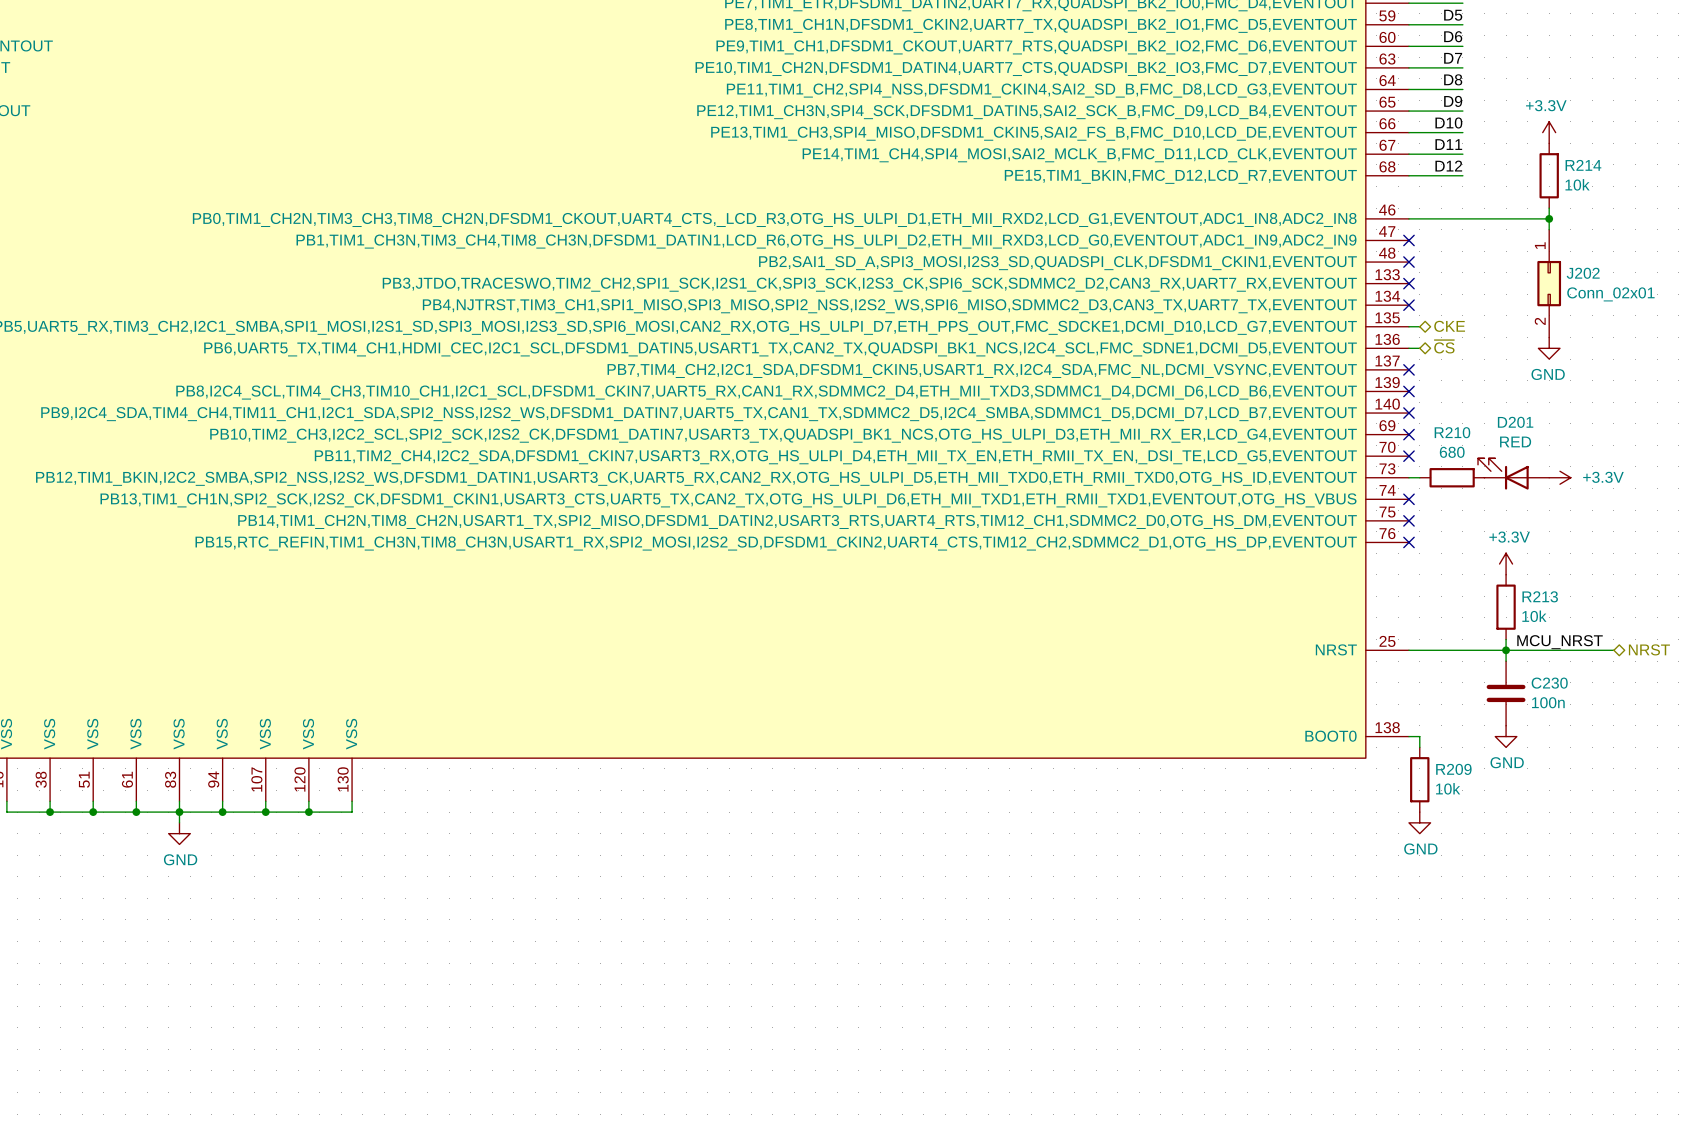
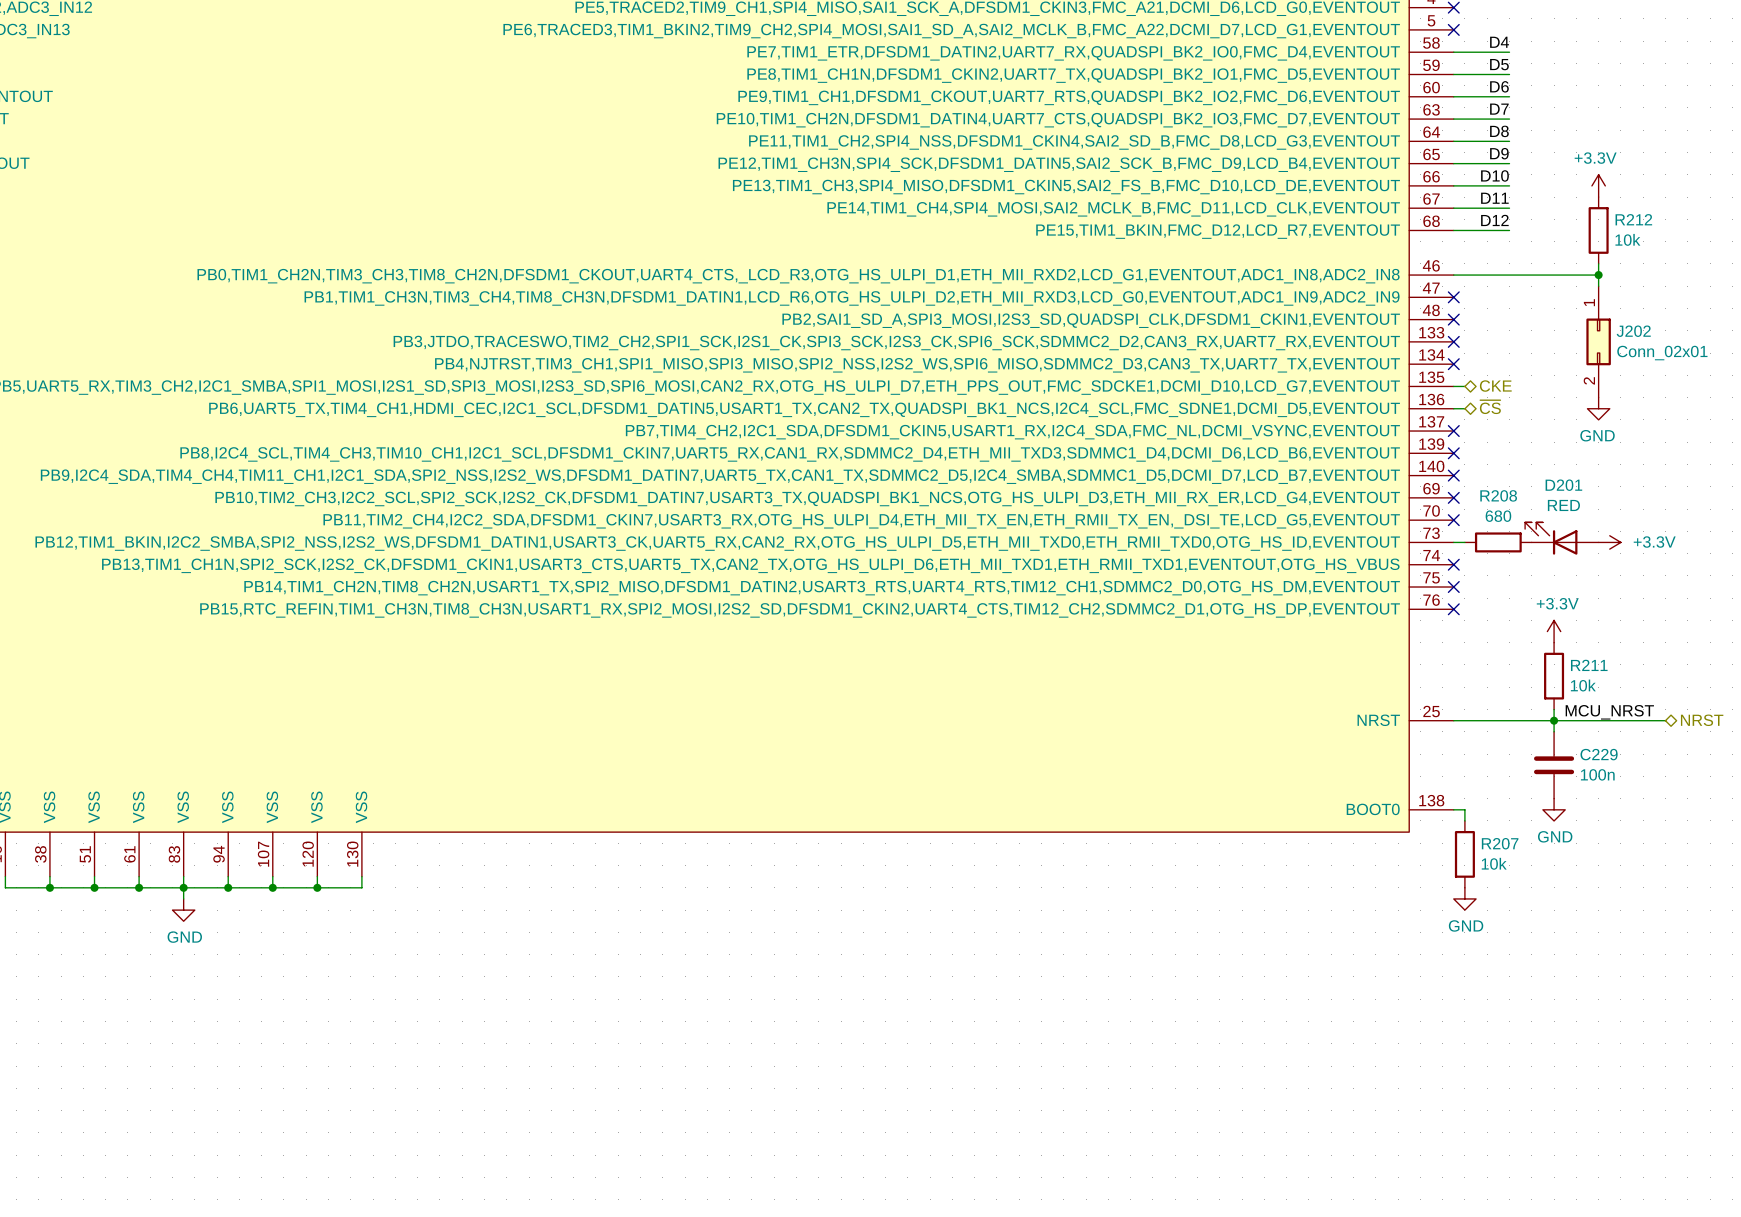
R214 name: R214 (1583, 165) -> R212 (1633, 219)
R210 name: R210 (1452, 432) -> R208 (1498, 495)
R213 name: R213 (1540, 596) -> R211 (1589, 665)
C230 name: C230 (1549, 683) -> C229 (1599, 754)
R209 name: R209 (1453, 769) -> R207 (1500, 843)

